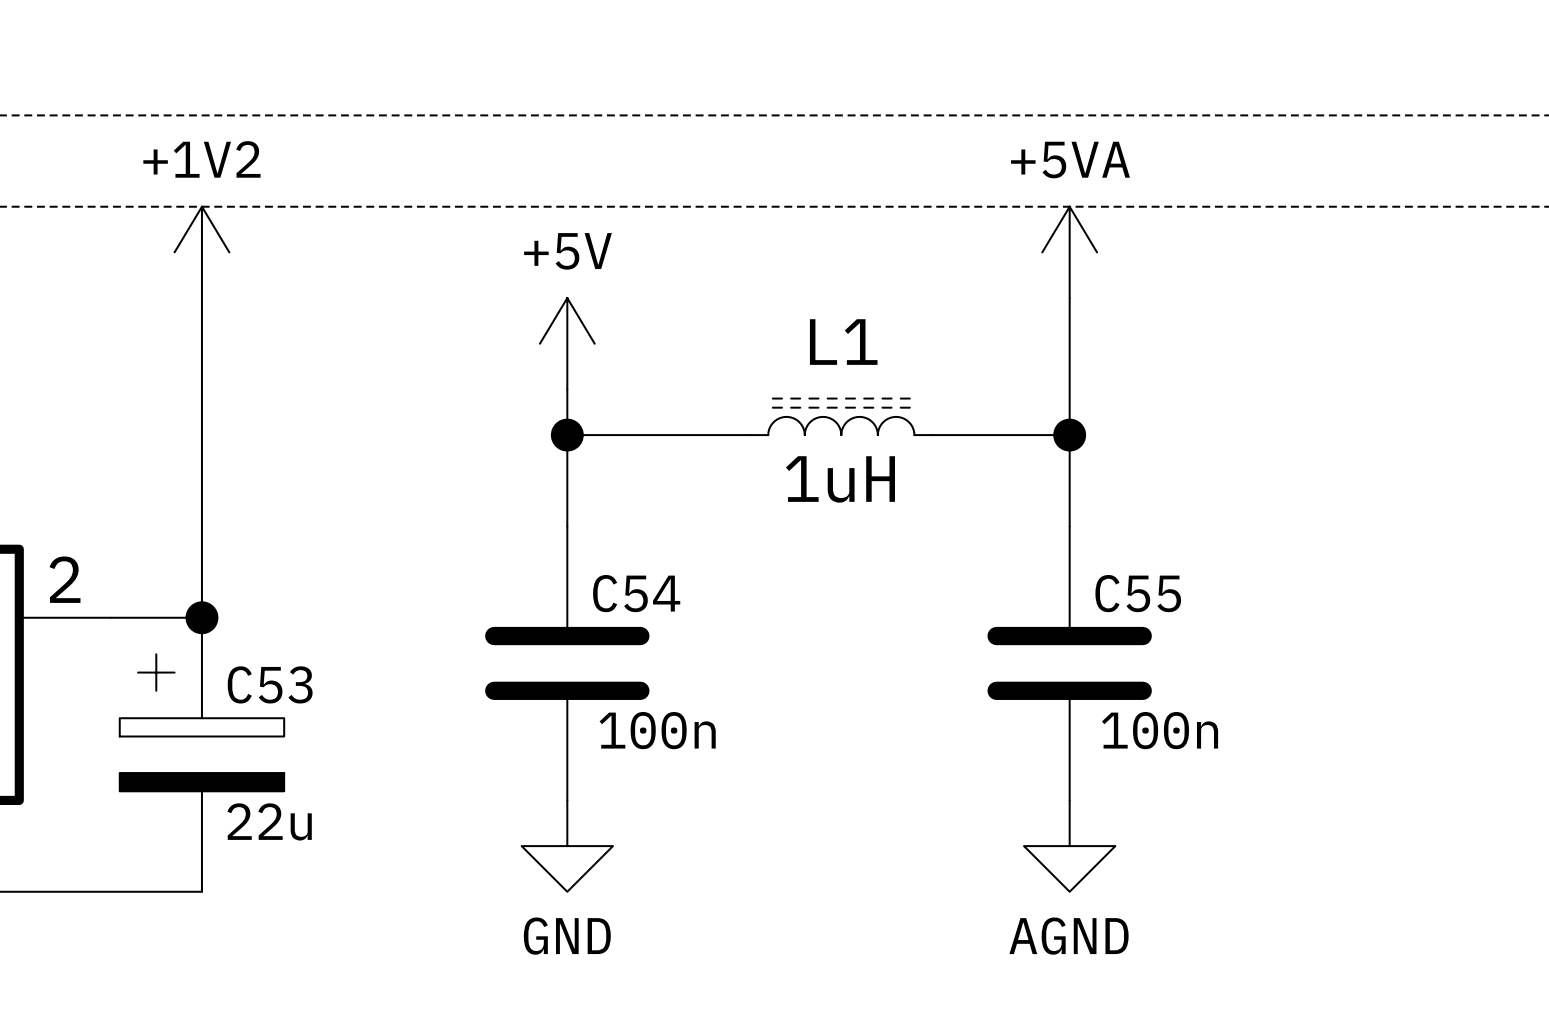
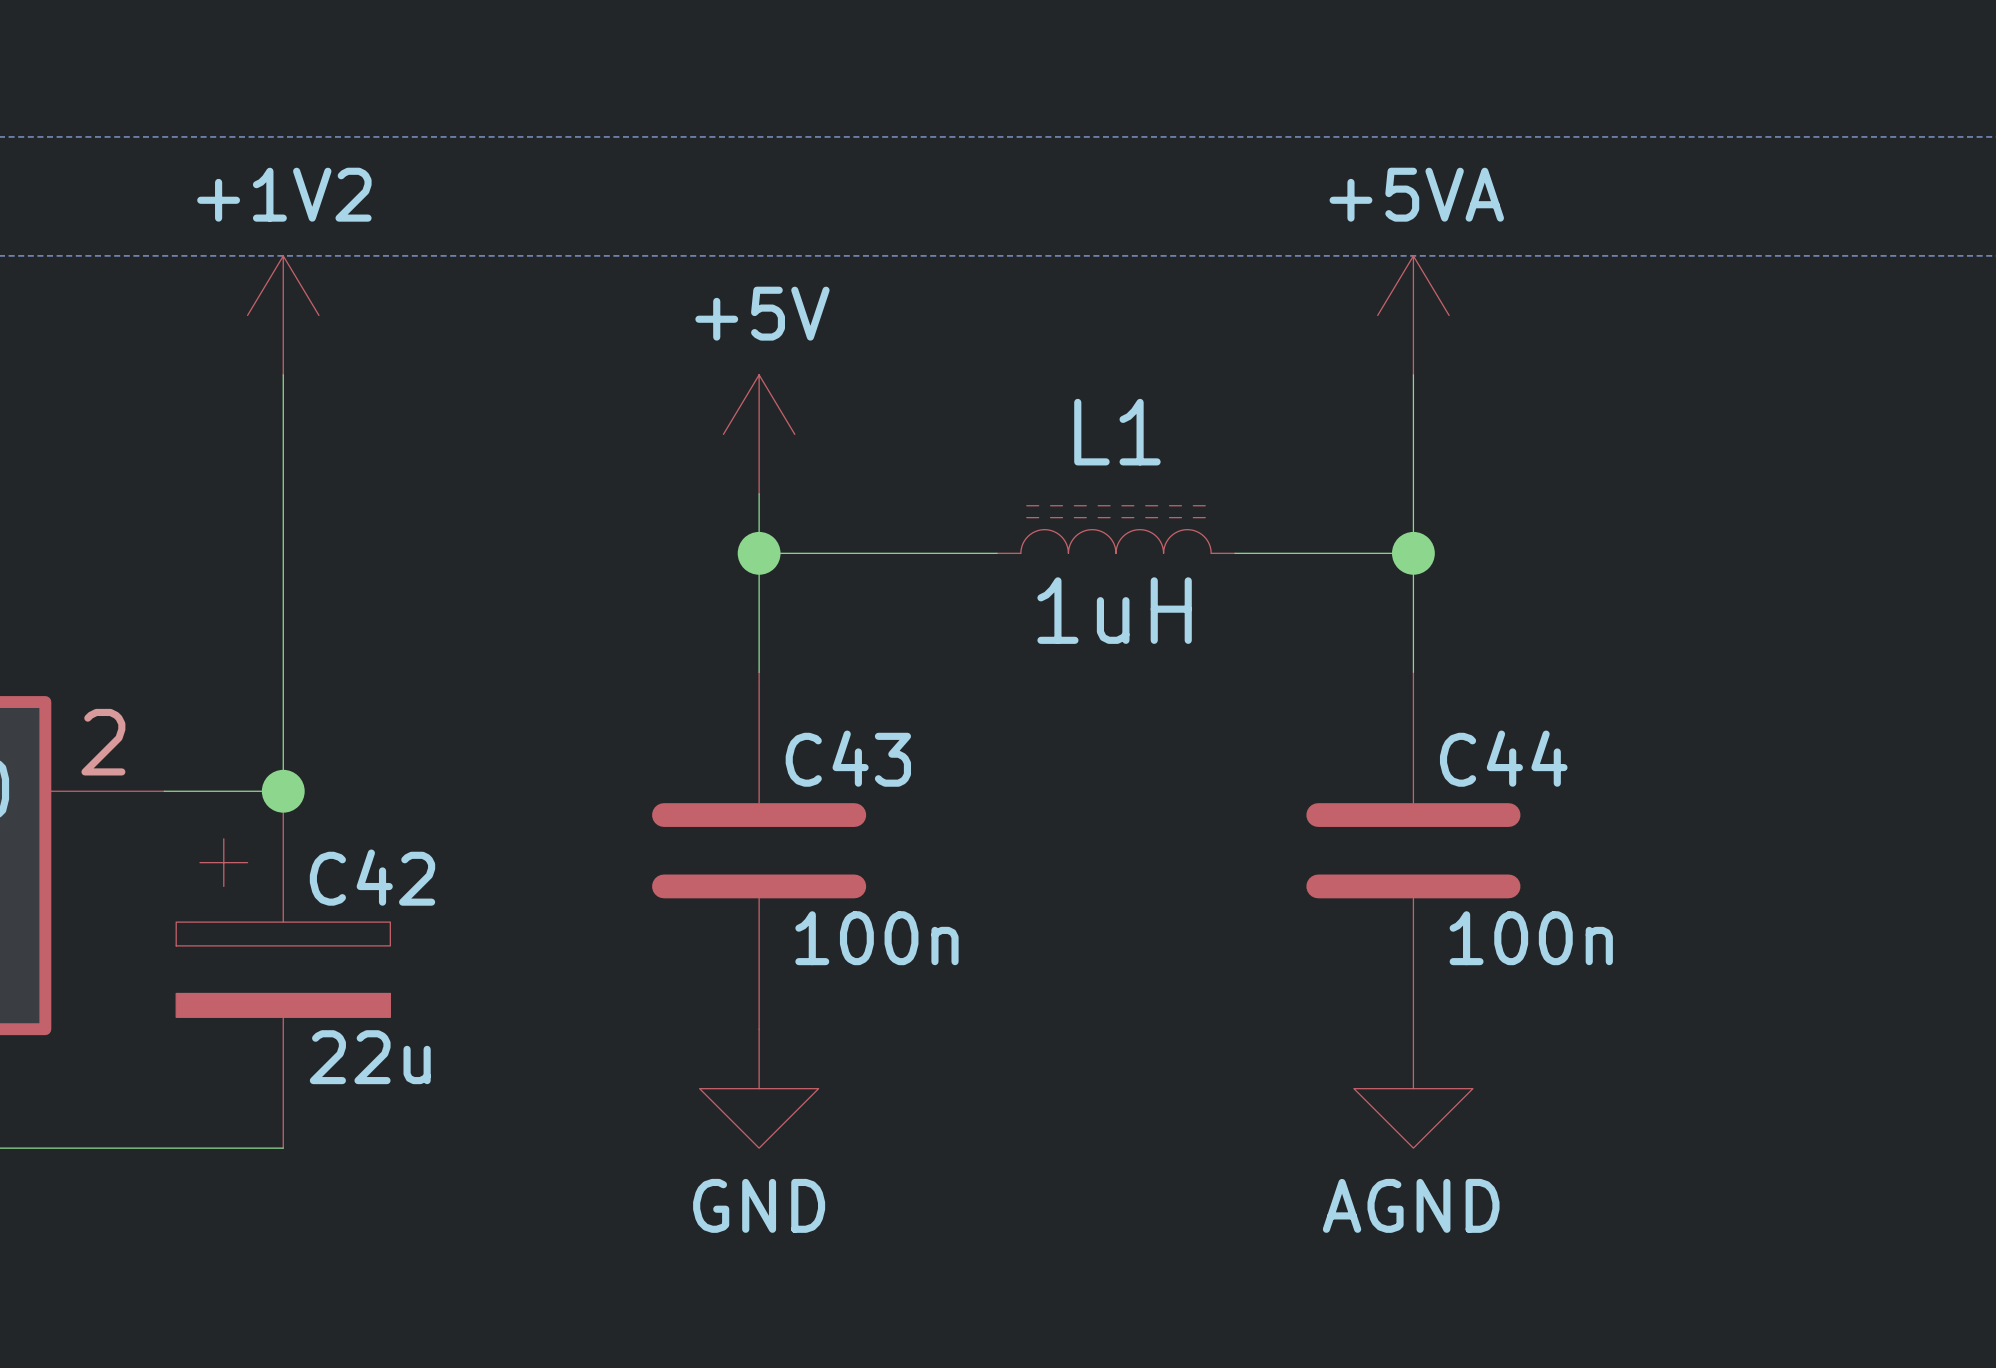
C54 name: C54 (636, 593) -> C43 (848, 758)
C55 name: C55 (1138, 593) -> C44 (1503, 758)
C53 name: C53 (270, 684) -> C42 (372, 877)

